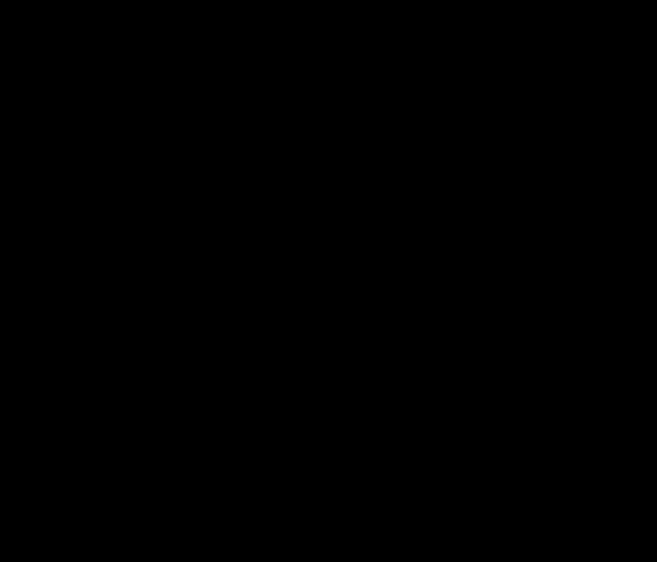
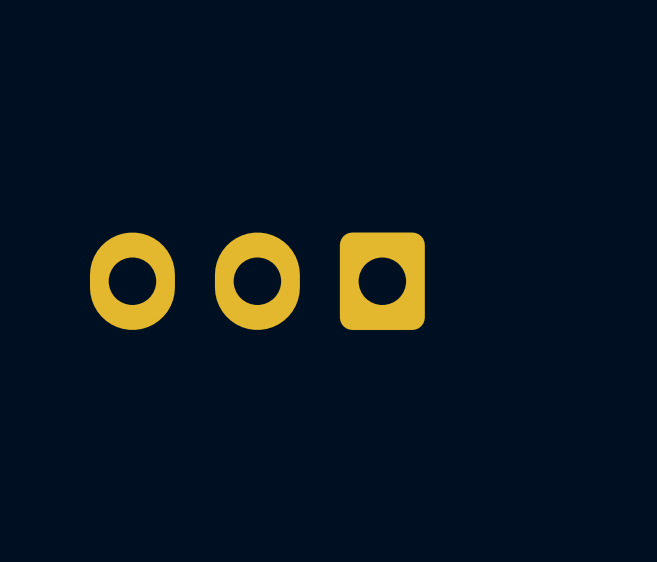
part: none -> (257, 281)

